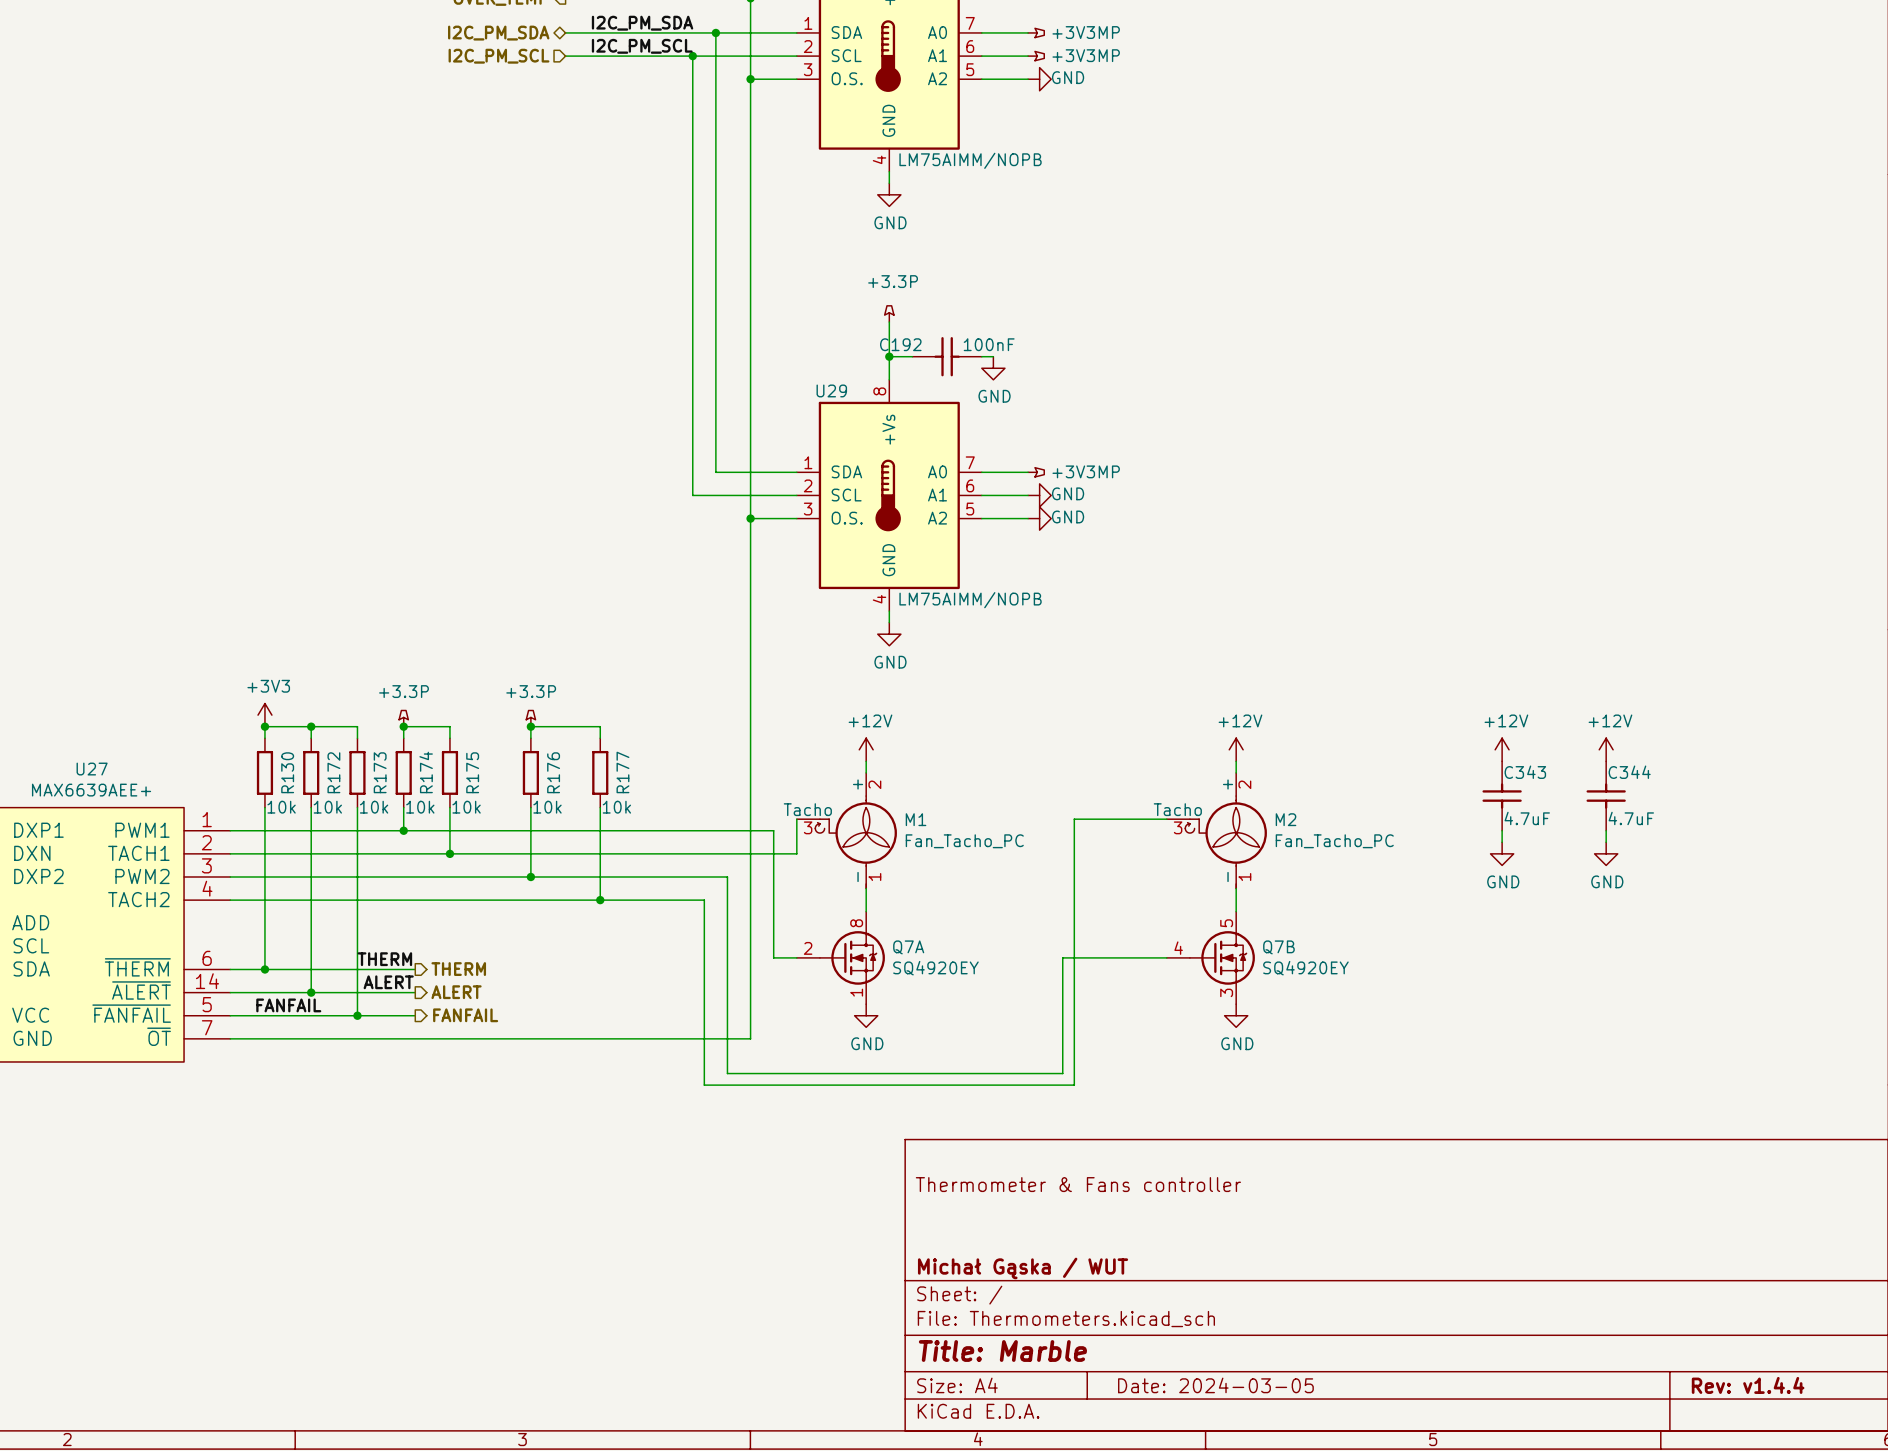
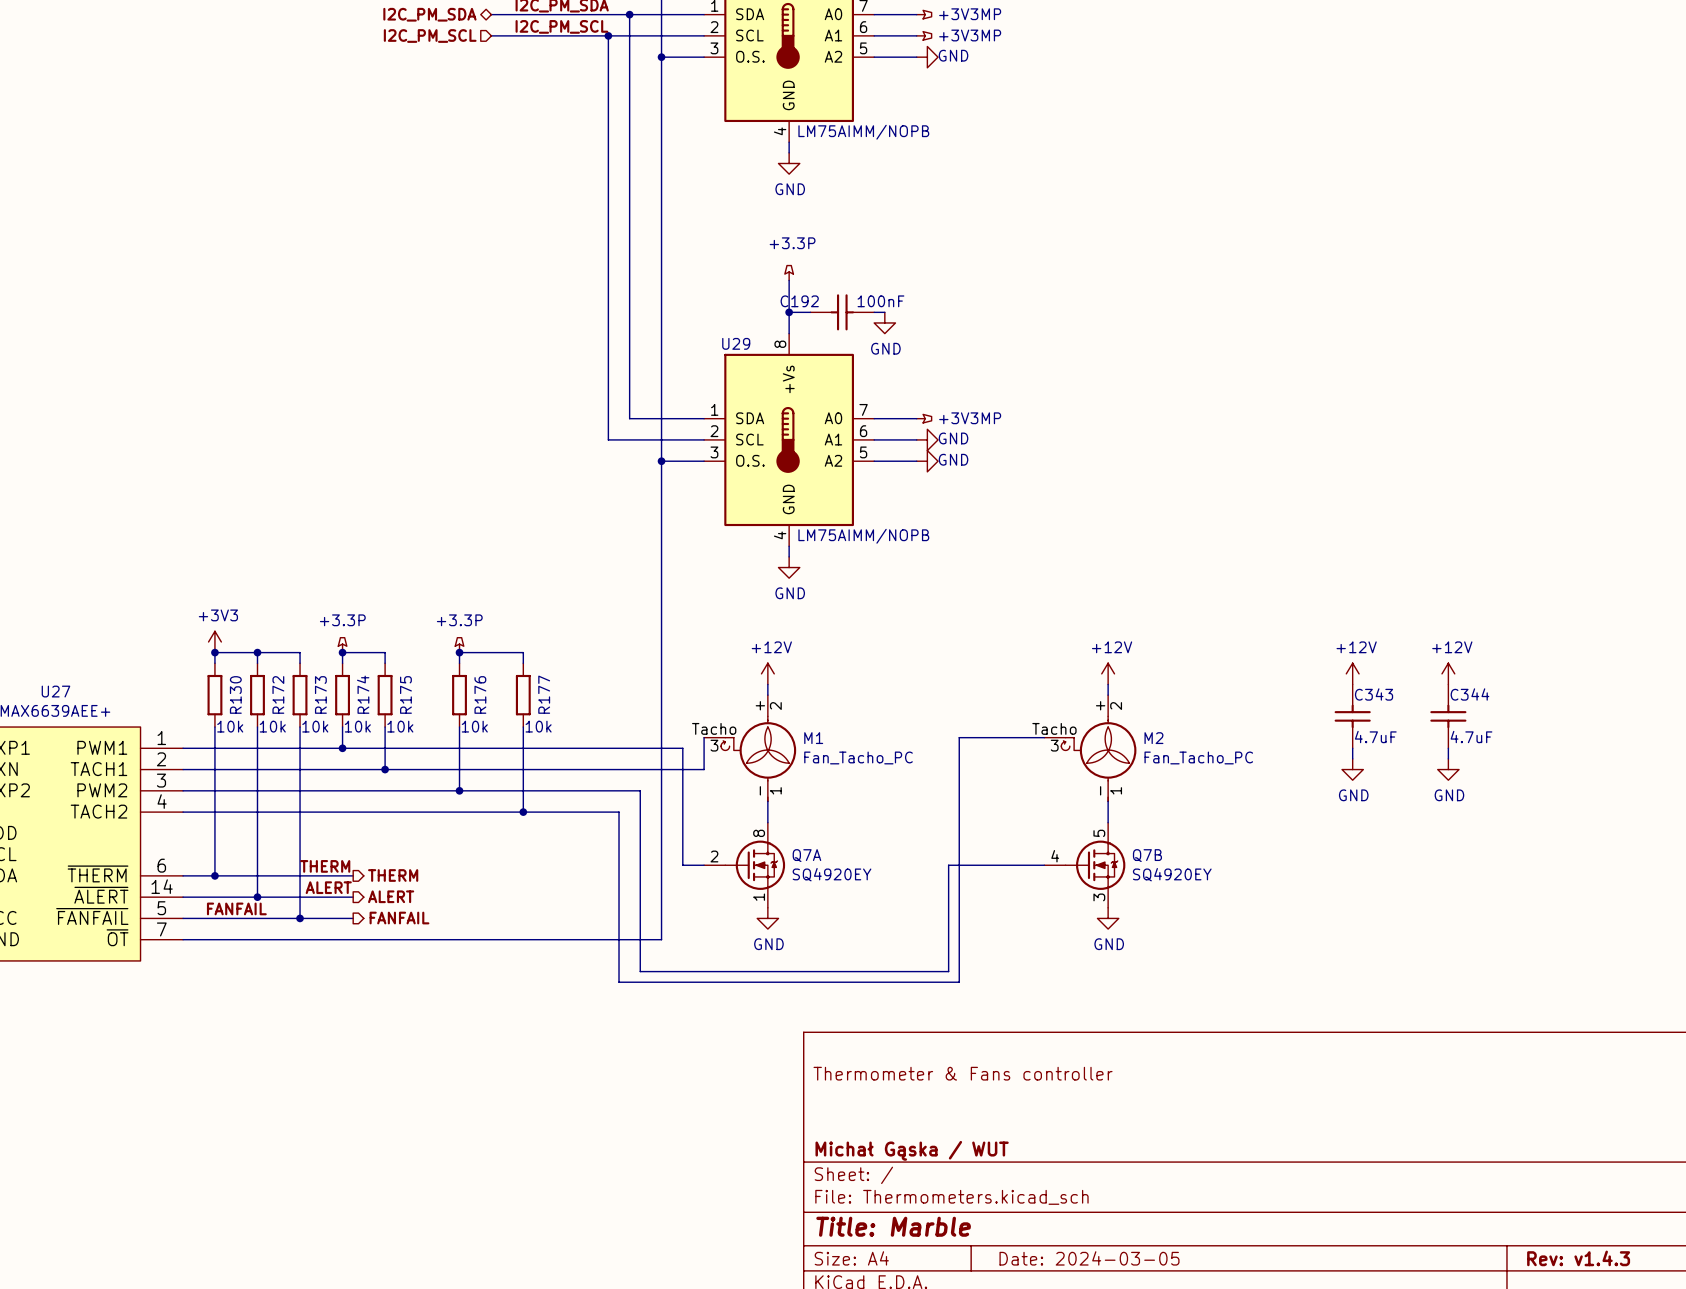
title block: Rev: v1.4.4 (1748, 1385) -> Rev: v1.4.3 (1578, 1258)

